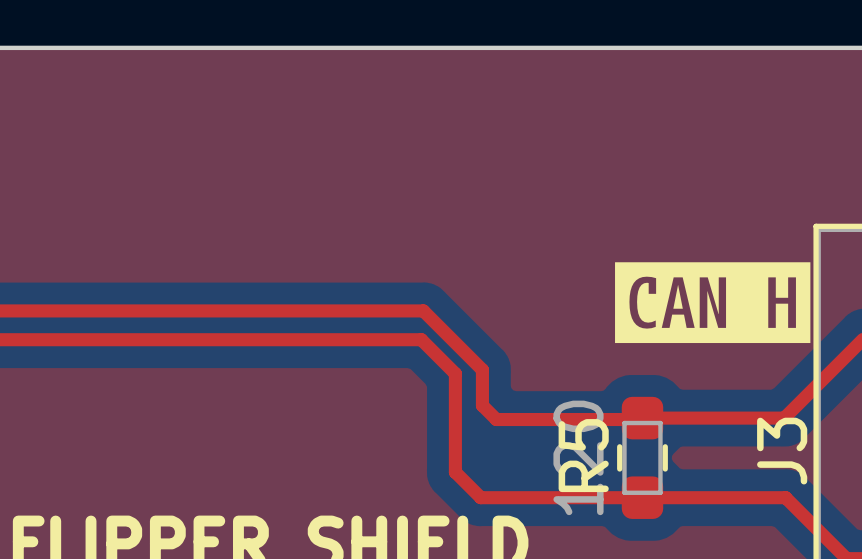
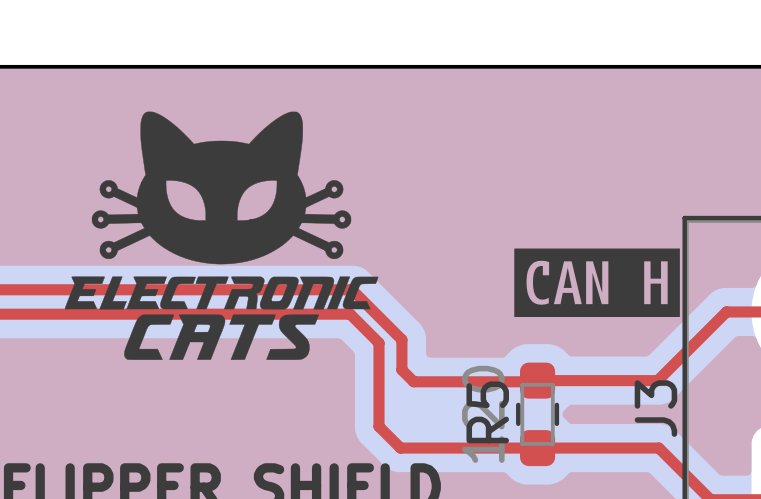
drawing: none -> [64, 111, 379, 360]

